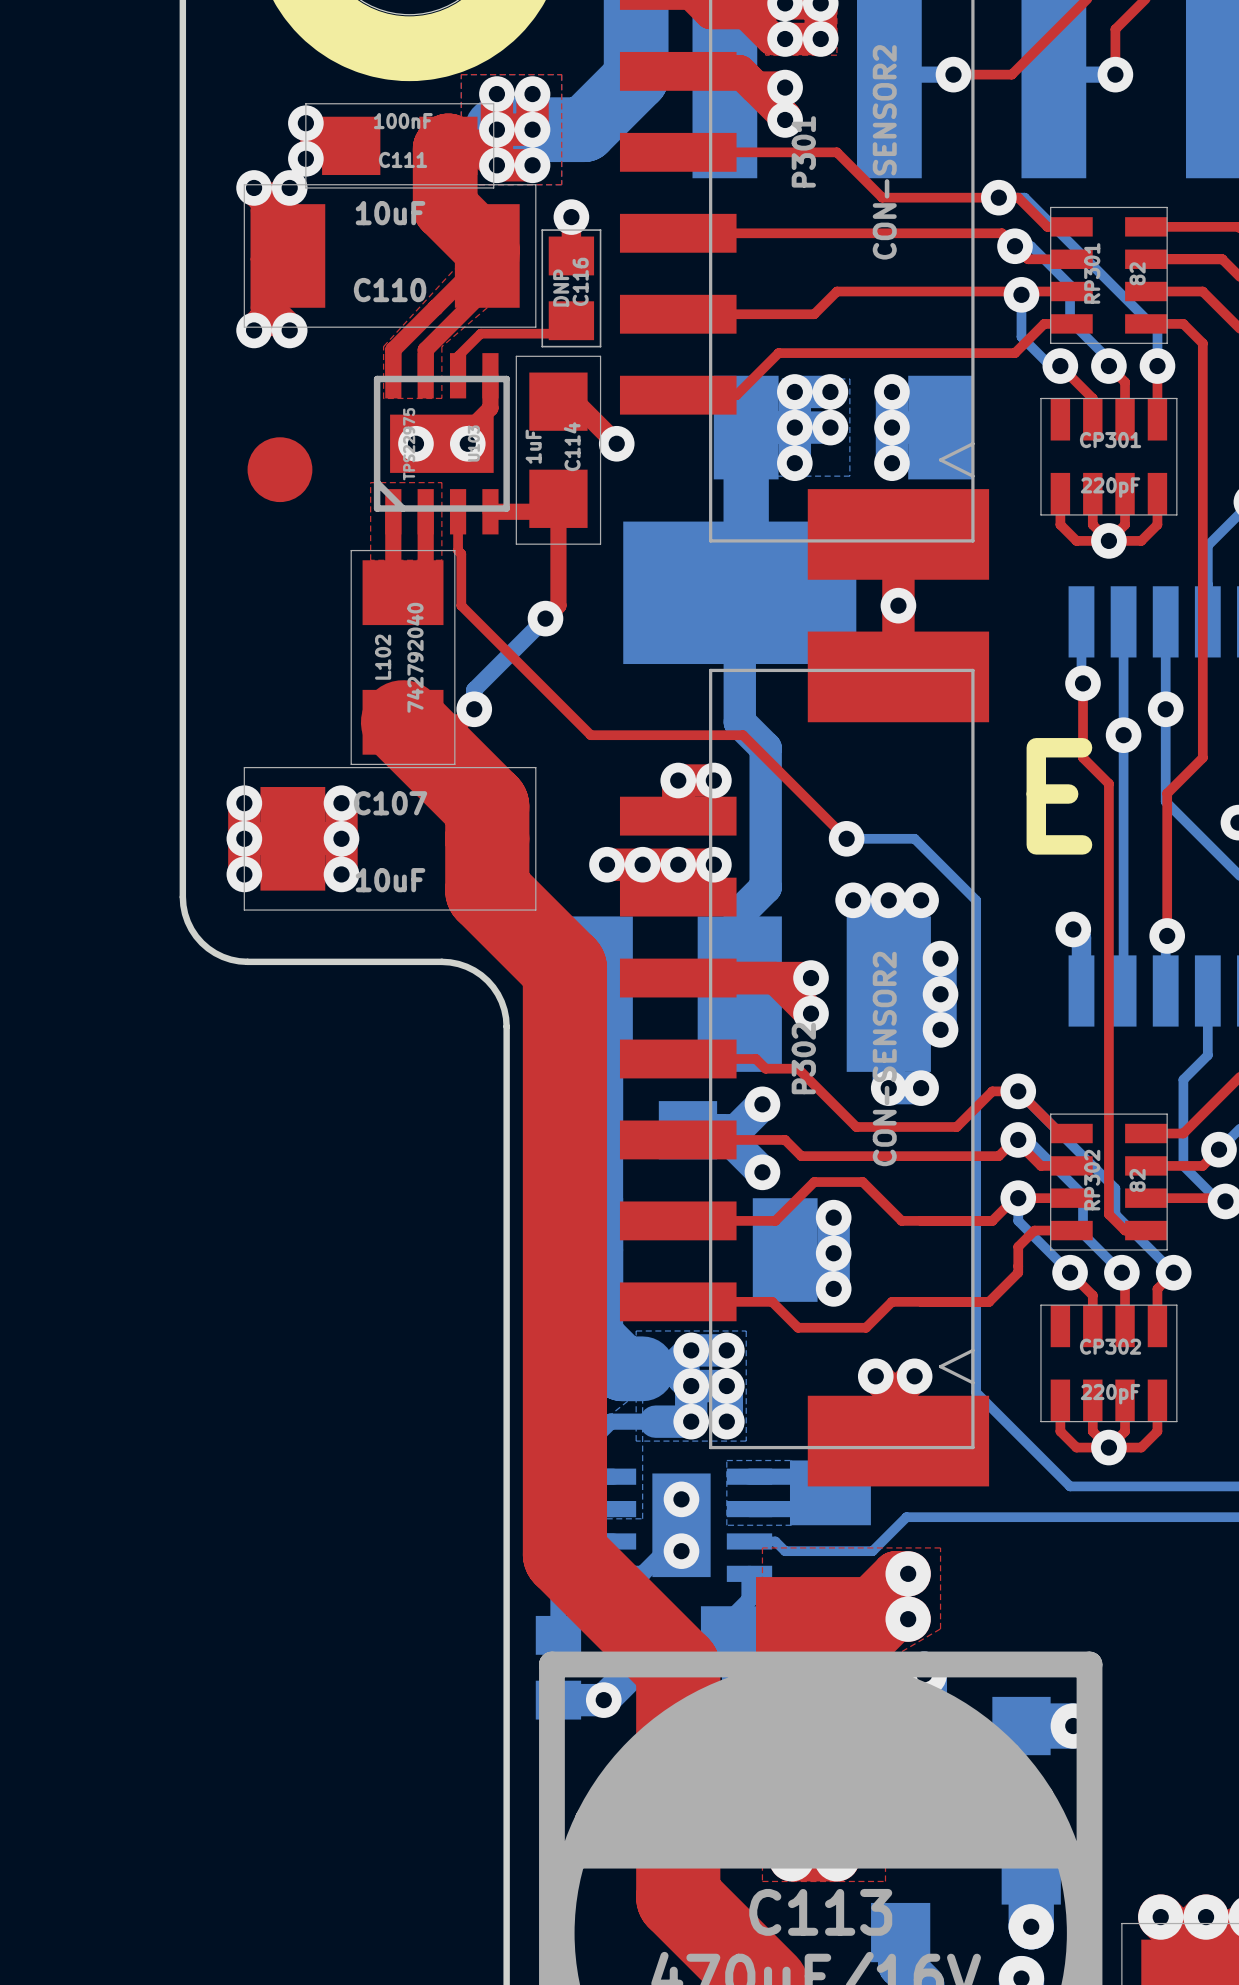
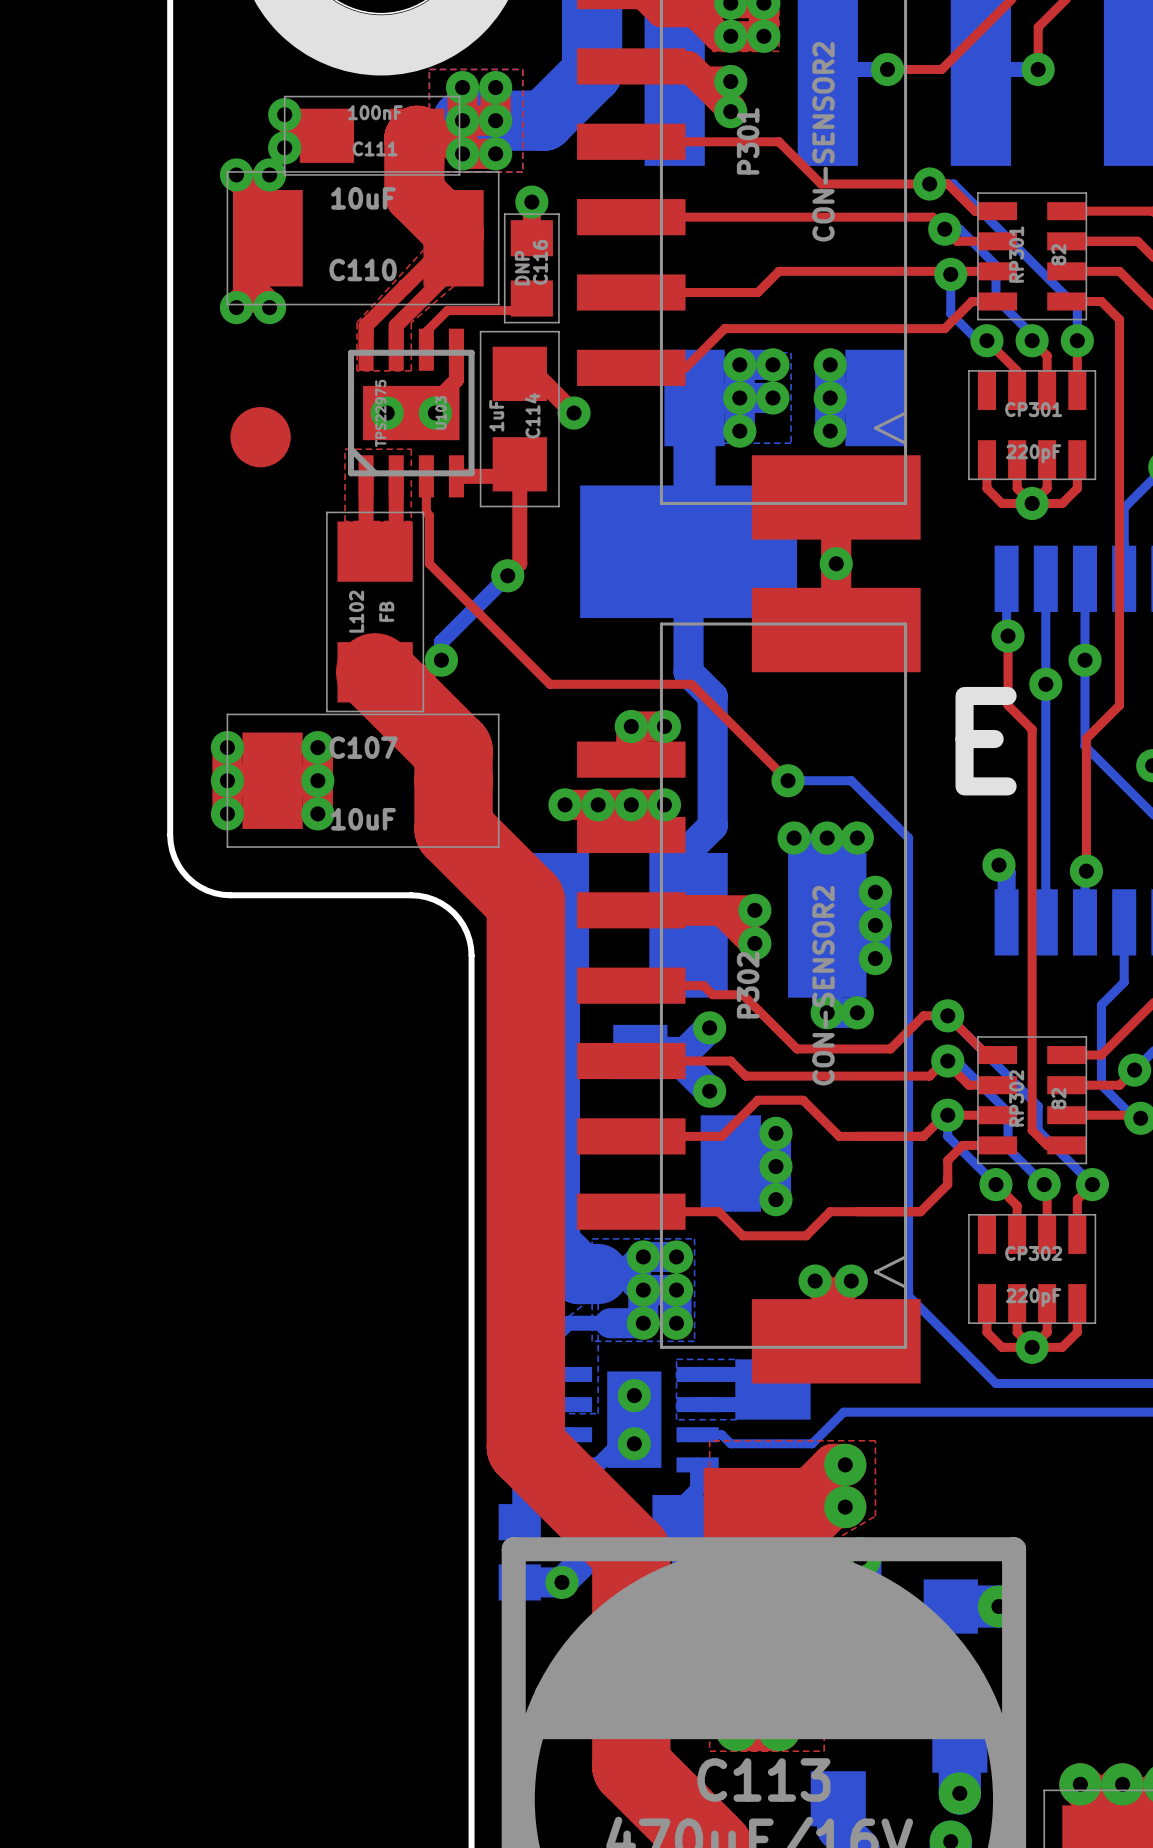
L102 value: 742792040 (415, 657) -> FB (386, 611)

